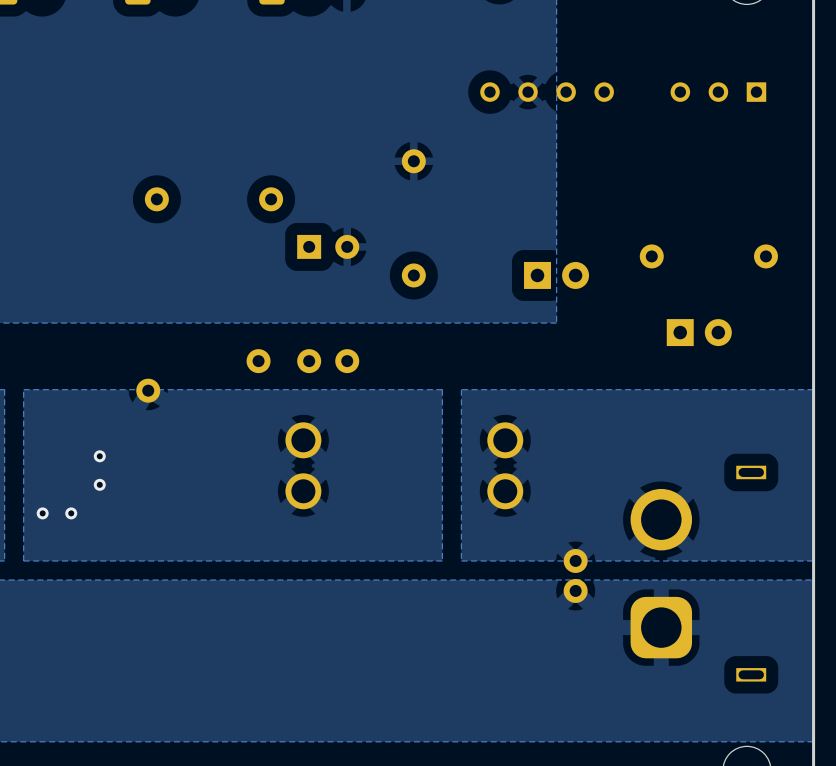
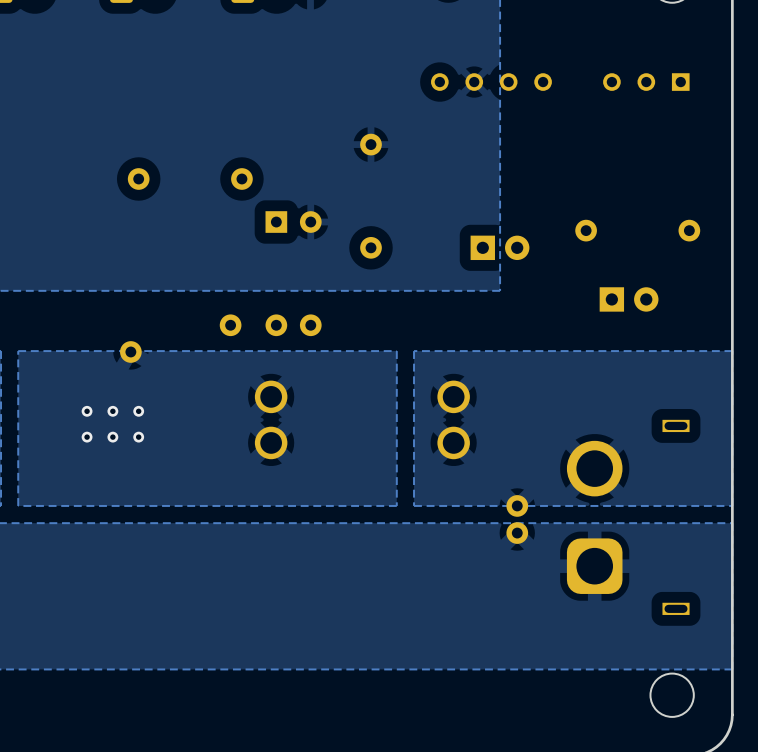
via: none -> (112, 411)
via: none -> (138, 411)
via: none -> (112, 437)
via: none -> (138, 437)
via: (42, 513) -> none
via: (71, 513) -> none

